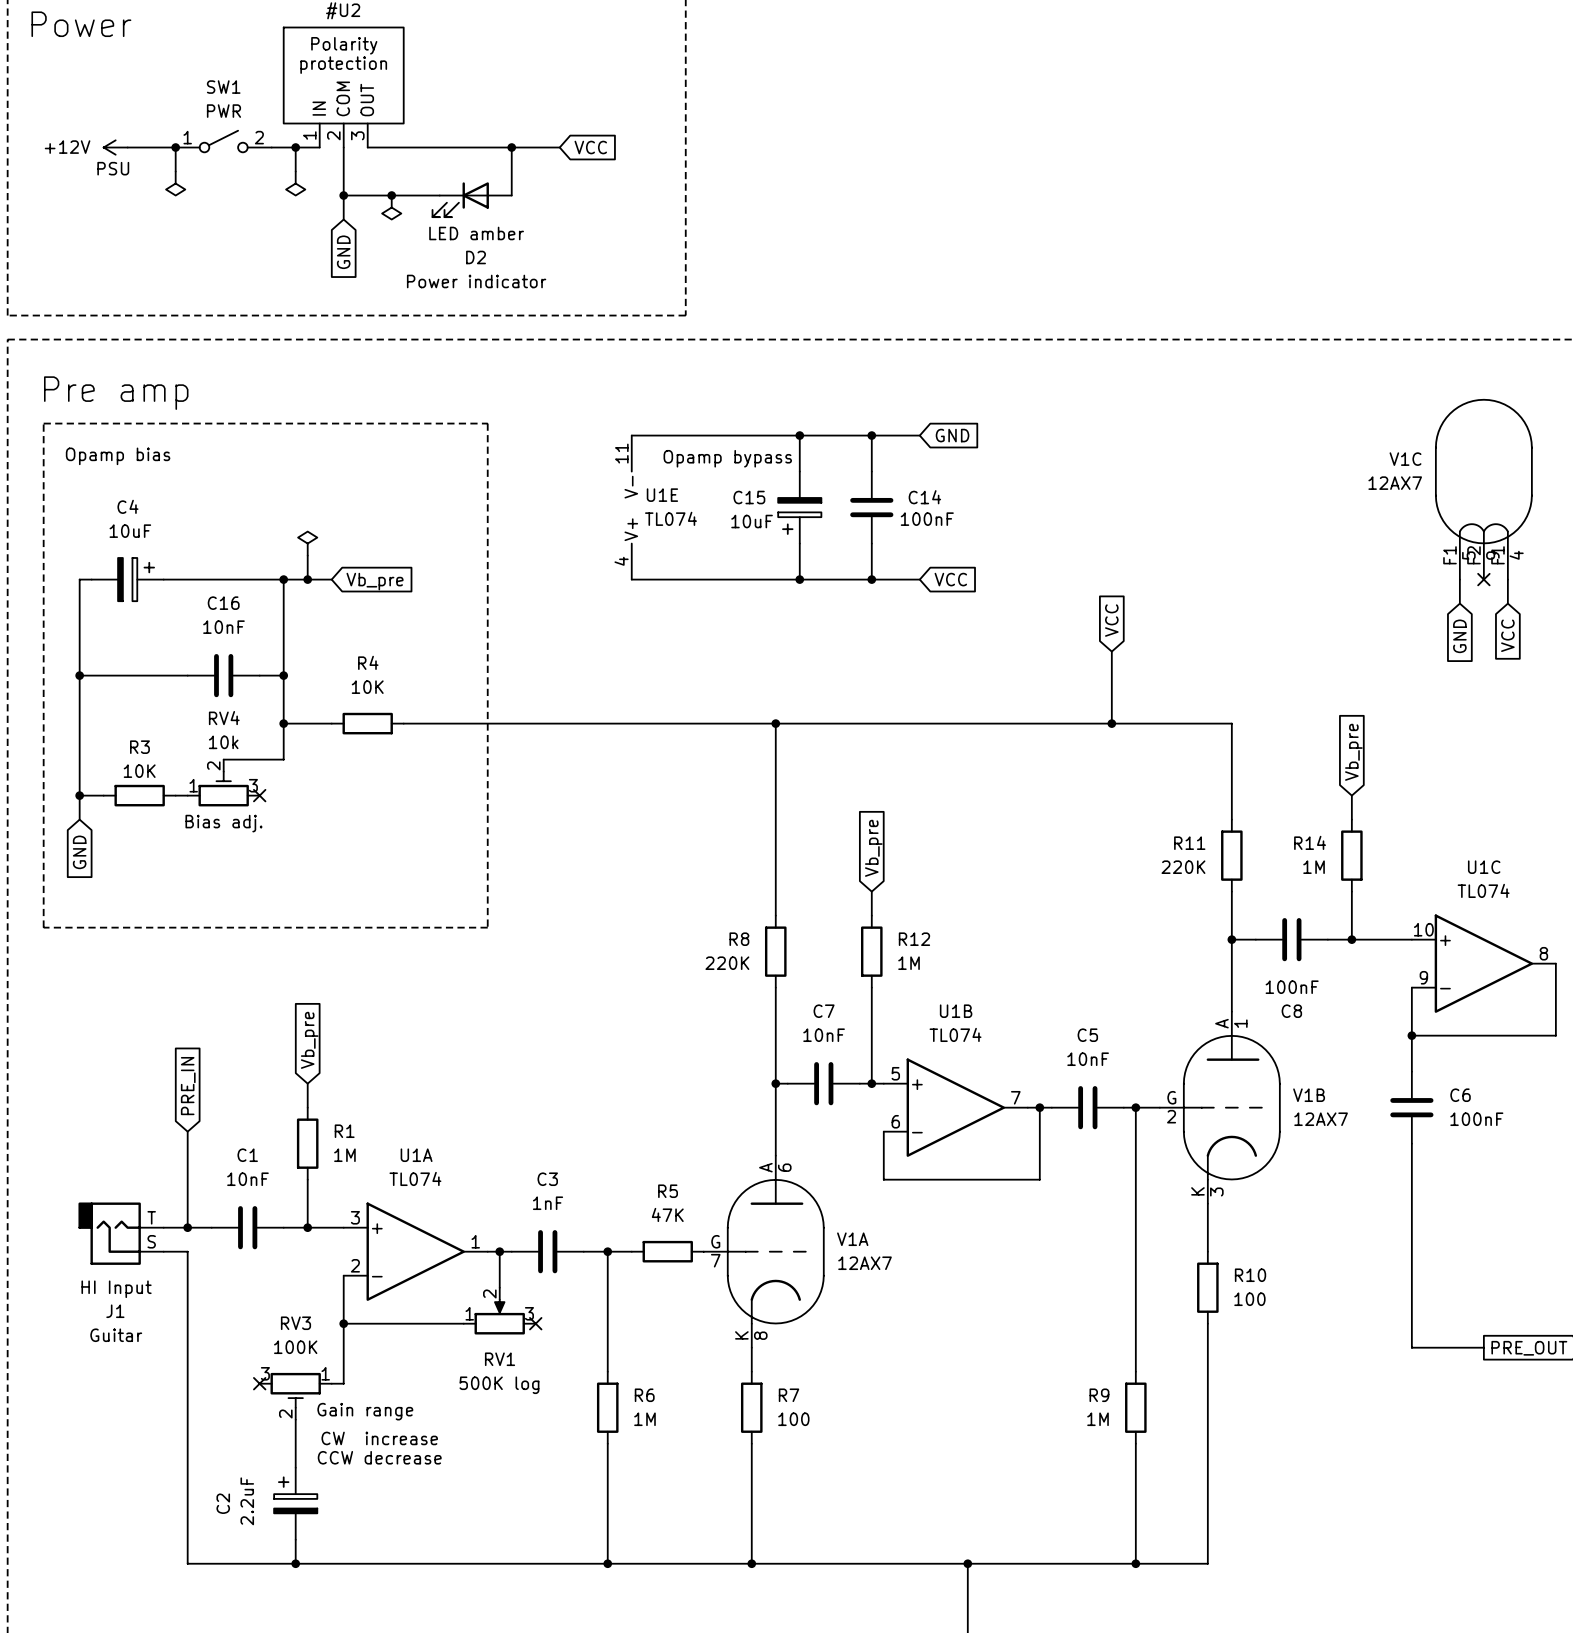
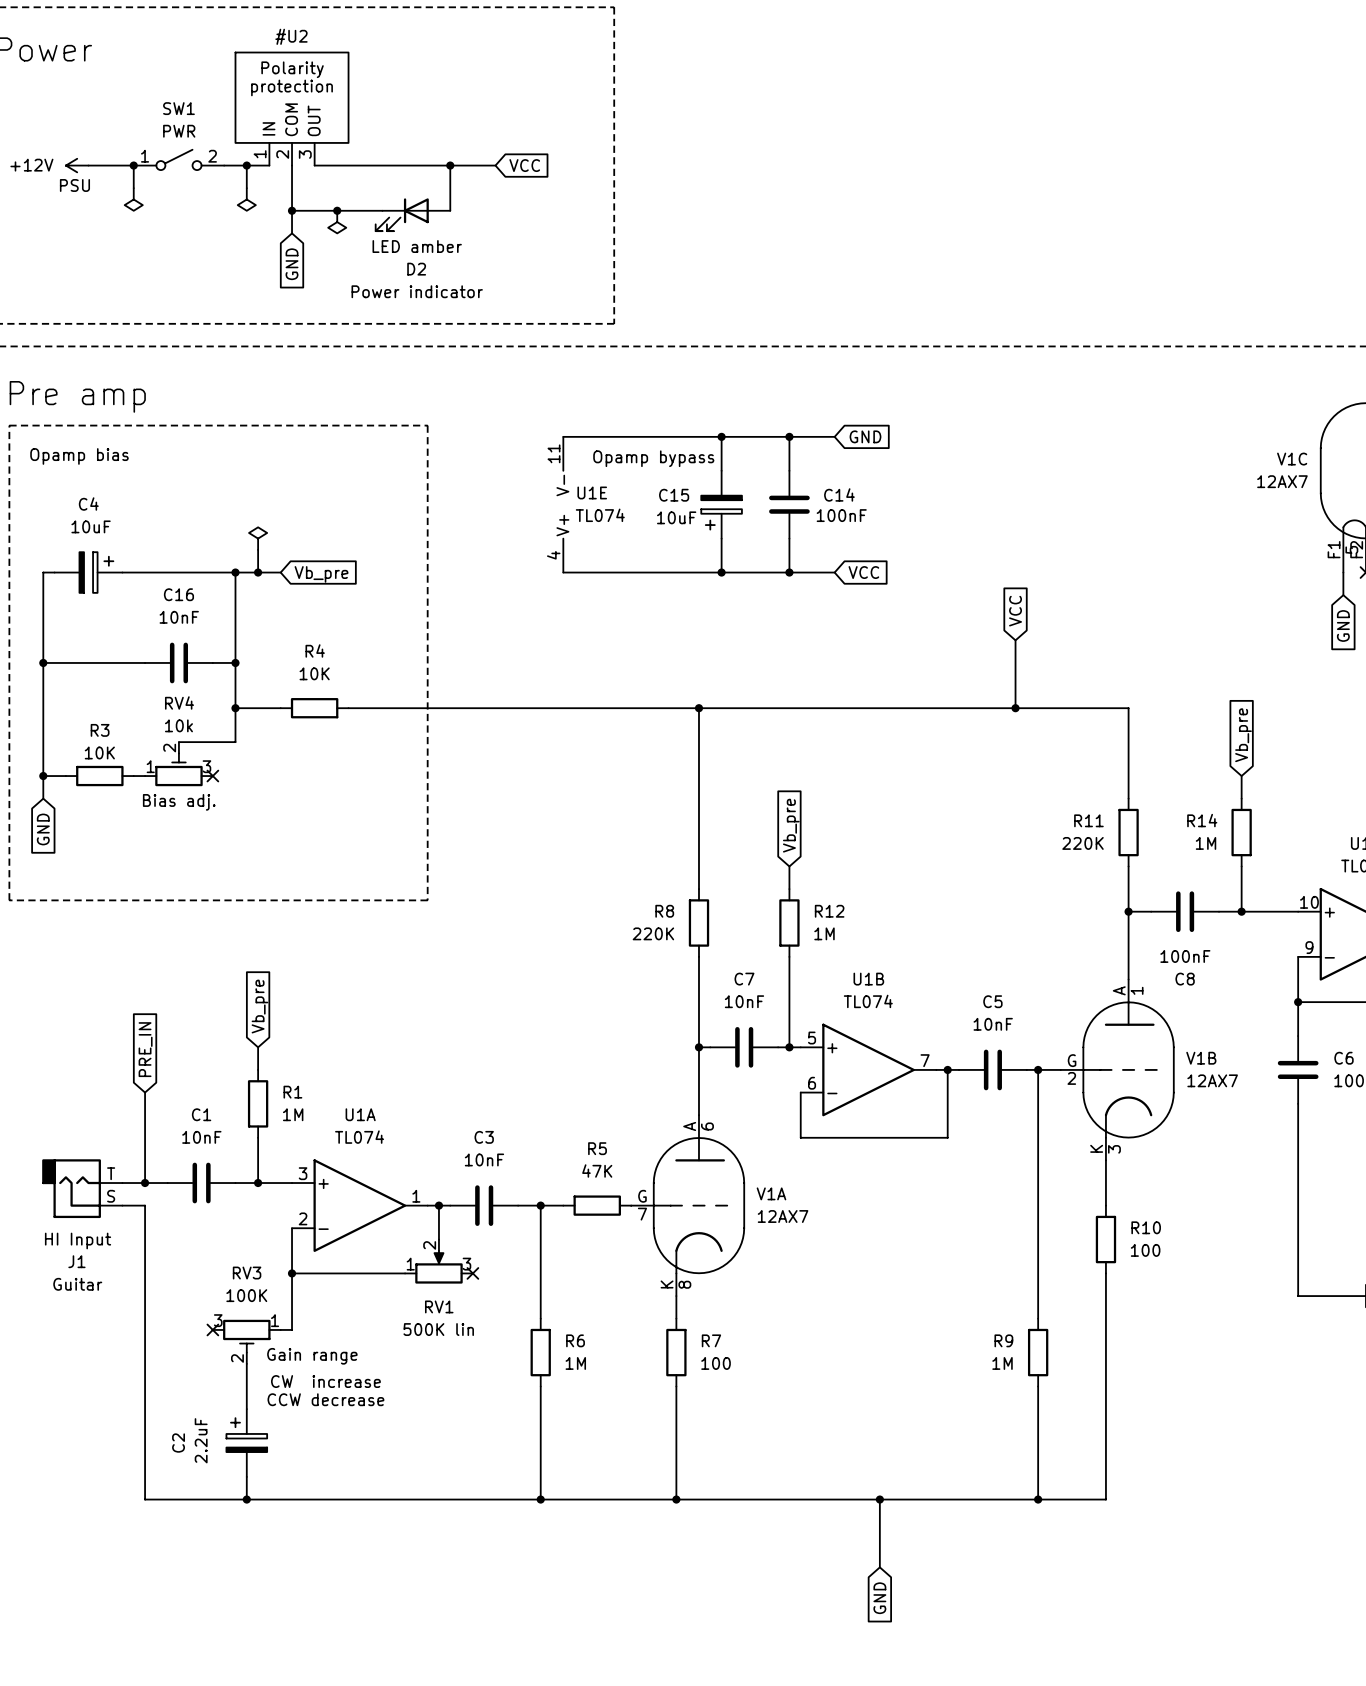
C3 value: 1nF (548, 1203) -> 10nF (484, 1159)
RV1 value: 500K log (499, 1385) -> 500K lin (438, 1329)

